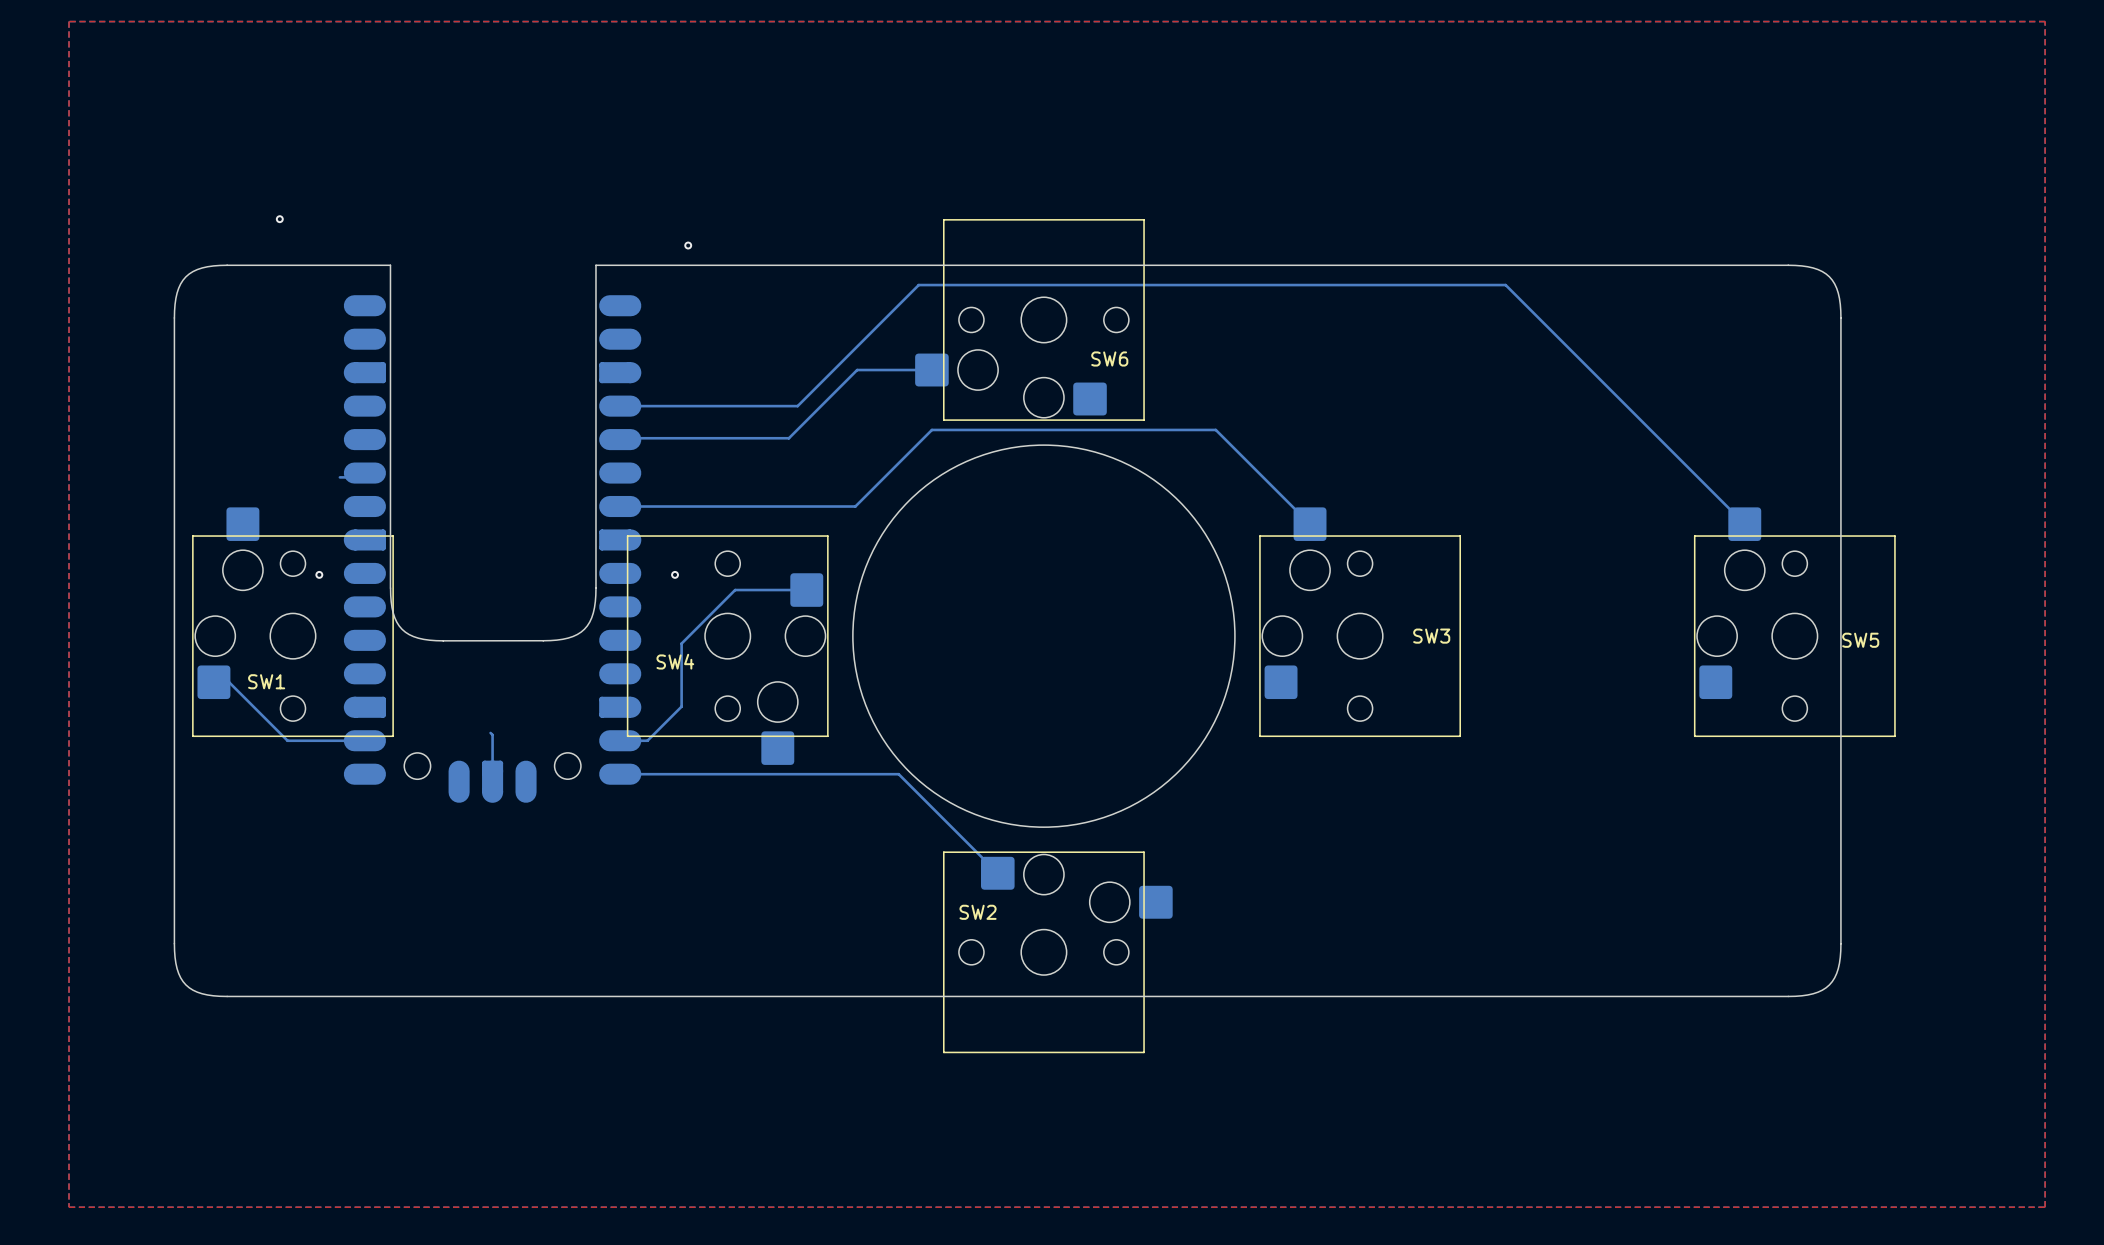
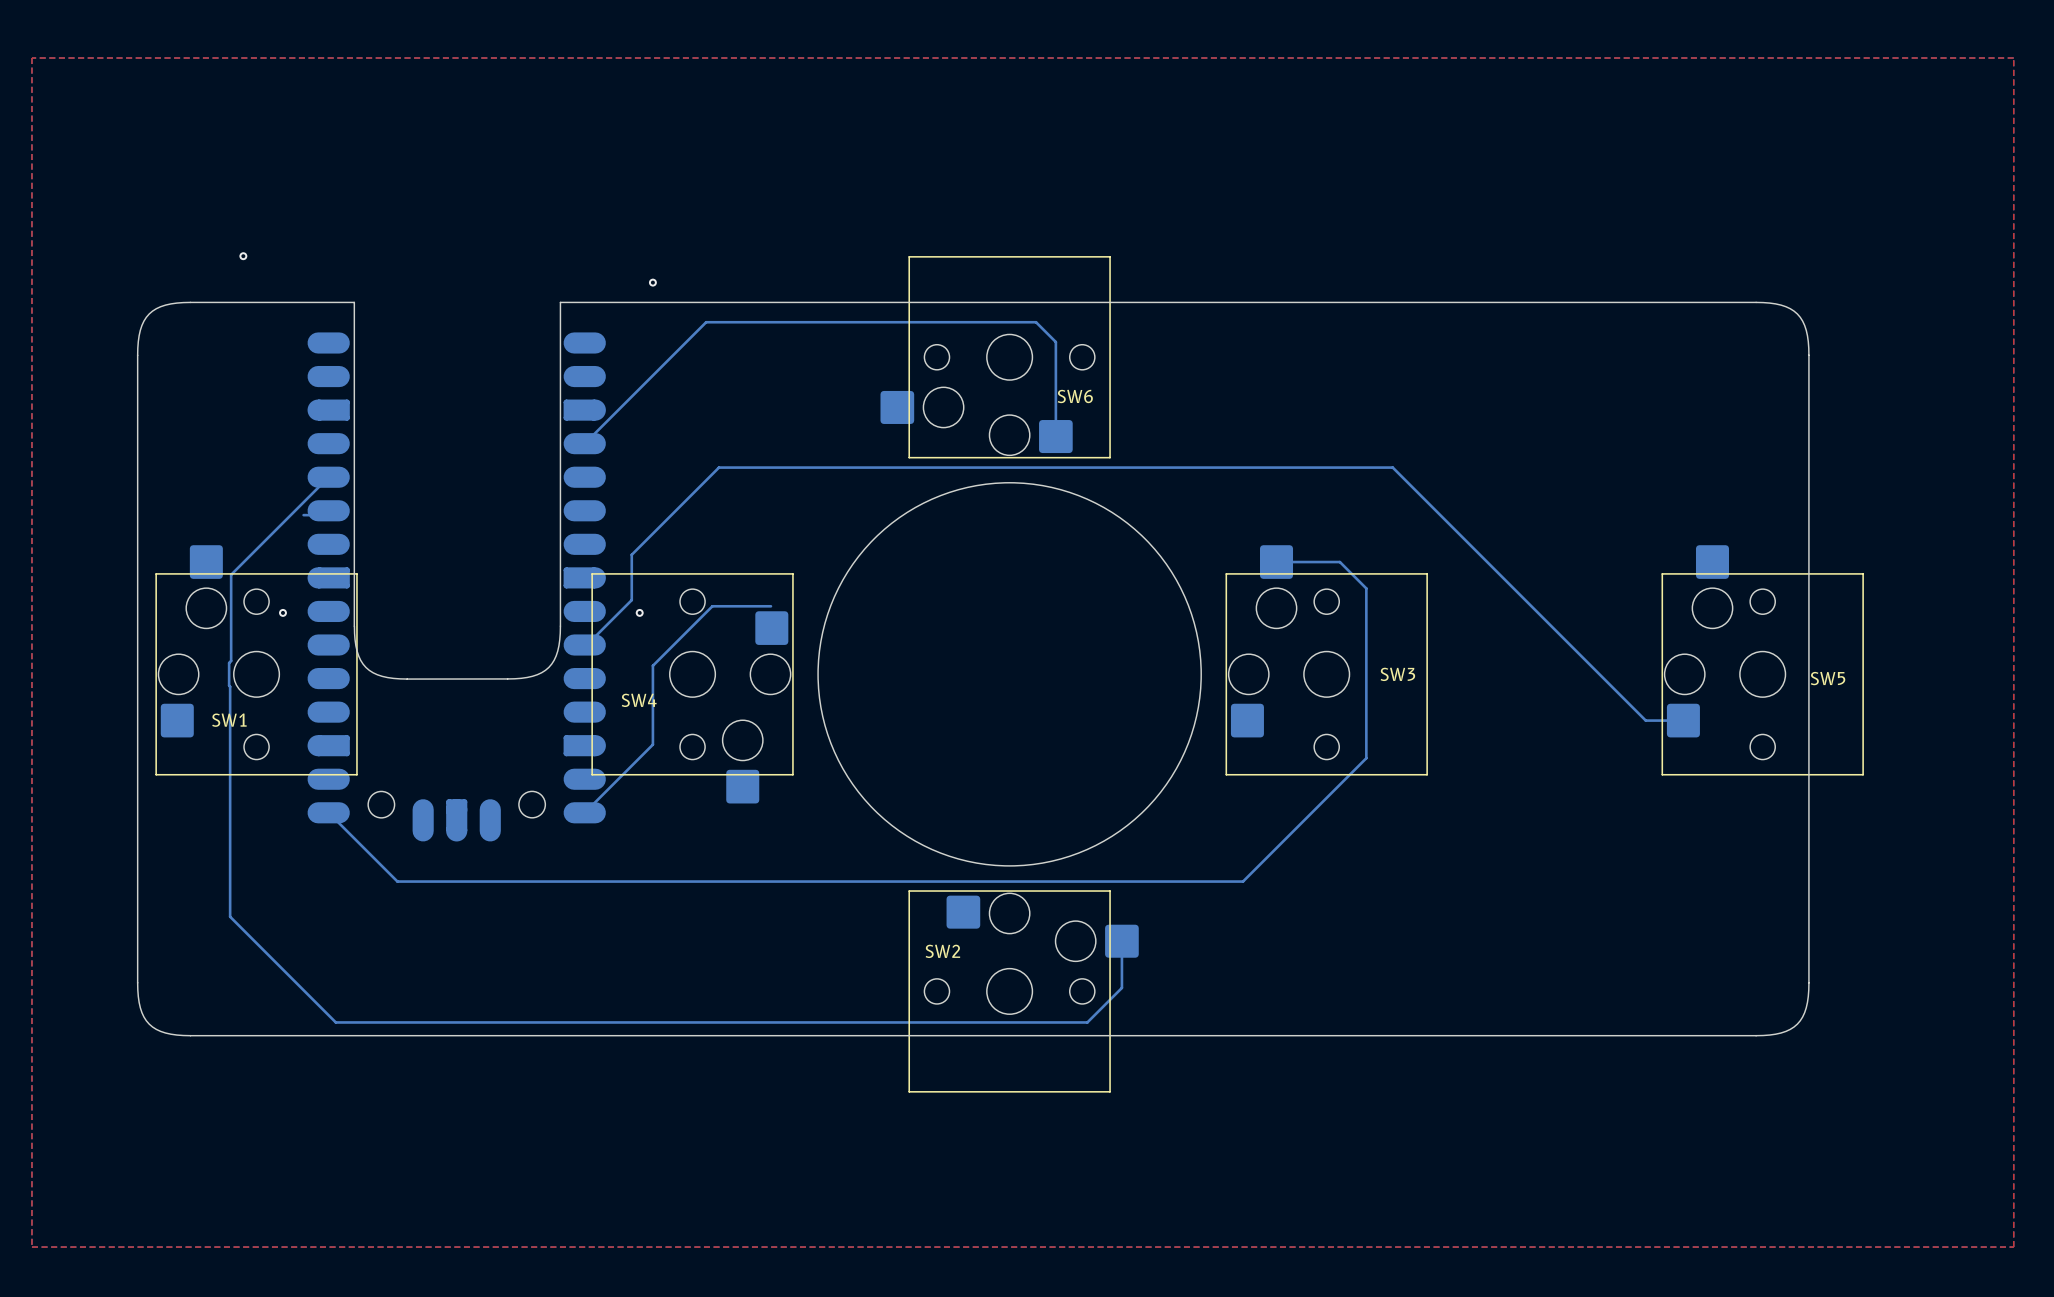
bottom track: (918, 285) (797, 406) (620, 406) -> (884, 322) (706, 322) (587, 441)
bottom track: (1070, 285) (1505, 285) (1744, 524) -> (1036, 322) (1055, 342) (1055, 436)
bottom track: (931, 370) (857, 370) (788, 438) (620, 439) -> none
bottom track: (931, 429) (855, 506) (620, 506) -> (897, 467) (718, 467) (631, 554) (631, 600) (586, 645)
bottom track: (1215, 429) (1310, 524) -> (1182, 467) (1392, 467) (1645, 720) (1683, 720)
bottom track: none -> (328, 477) (231, 574) (231, 660) (229, 662) (230, 916) (335, 1022) (1087, 1022) (1121, 987) (1121, 941)
bottom track: none -> (1276, 562) (1339, 562) (1366, 588) (1366, 758) (1243, 881) (397, 881) (328, 812)
bottom track: (806, 590) (735, 590) (681, 643) (681, 706) (647, 740) (620, 740) -> none
bottom track: (213, 682) (229, 682) (287, 740) (364, 740) -> none
bottom track: (490, 732) (492, 734) (492, 771) -> none
bottom track: (620, 774) (898, 774) (997, 873) -> (584, 812) (652, 744) (652, 665) (712, 606) (770, 606)

